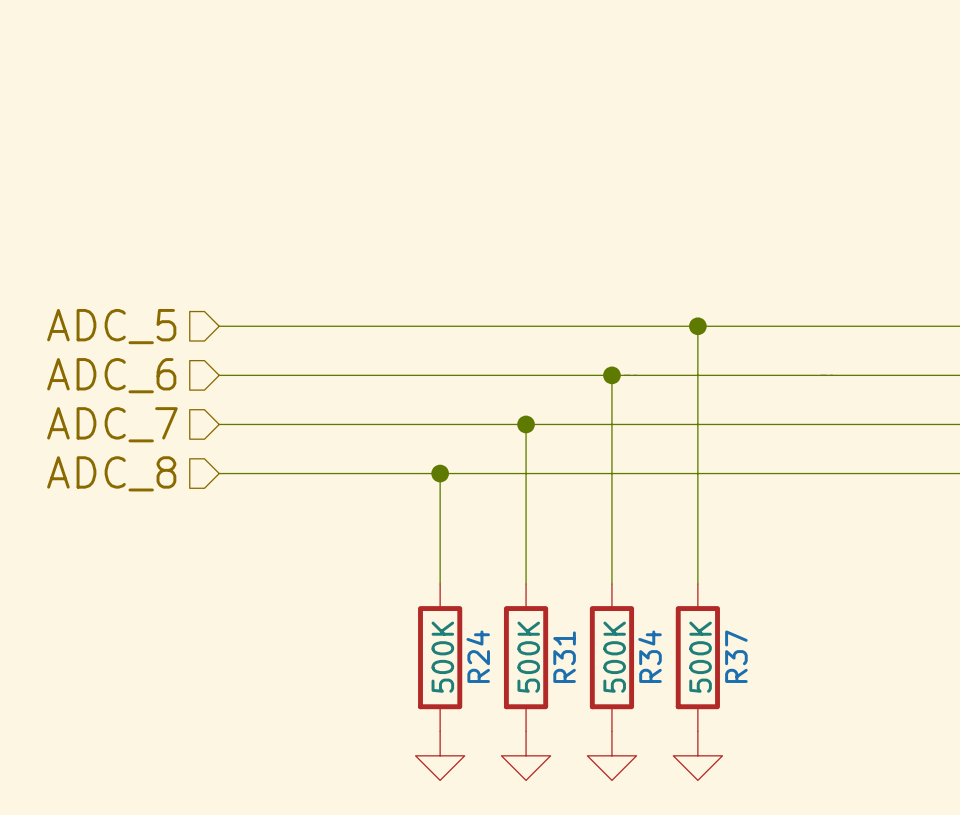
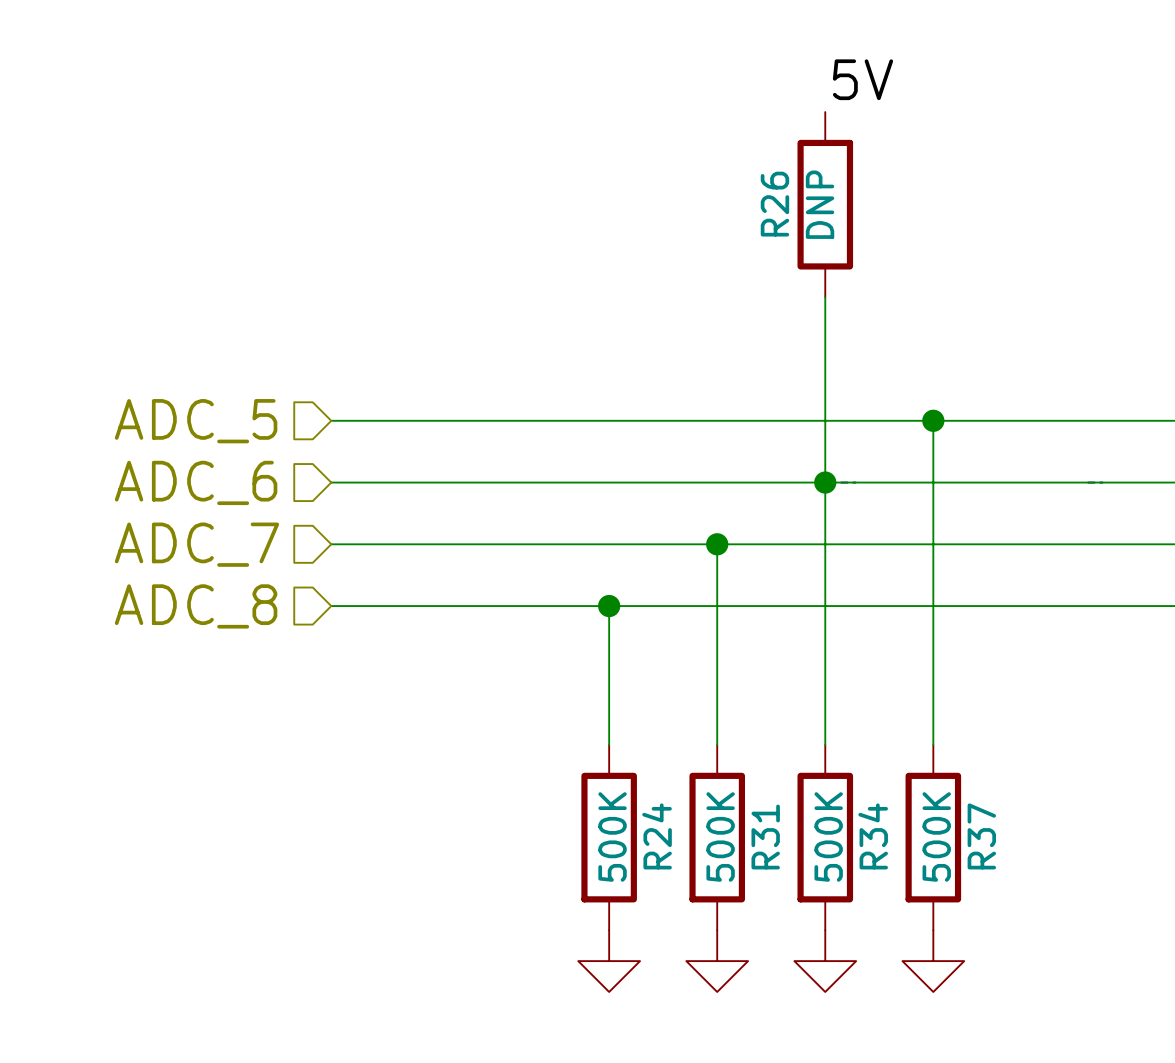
label: none -> 5V (862, 79)
R26: none -> DNP (825, 204)
wire: none -> (825, 297) (825, 482)

